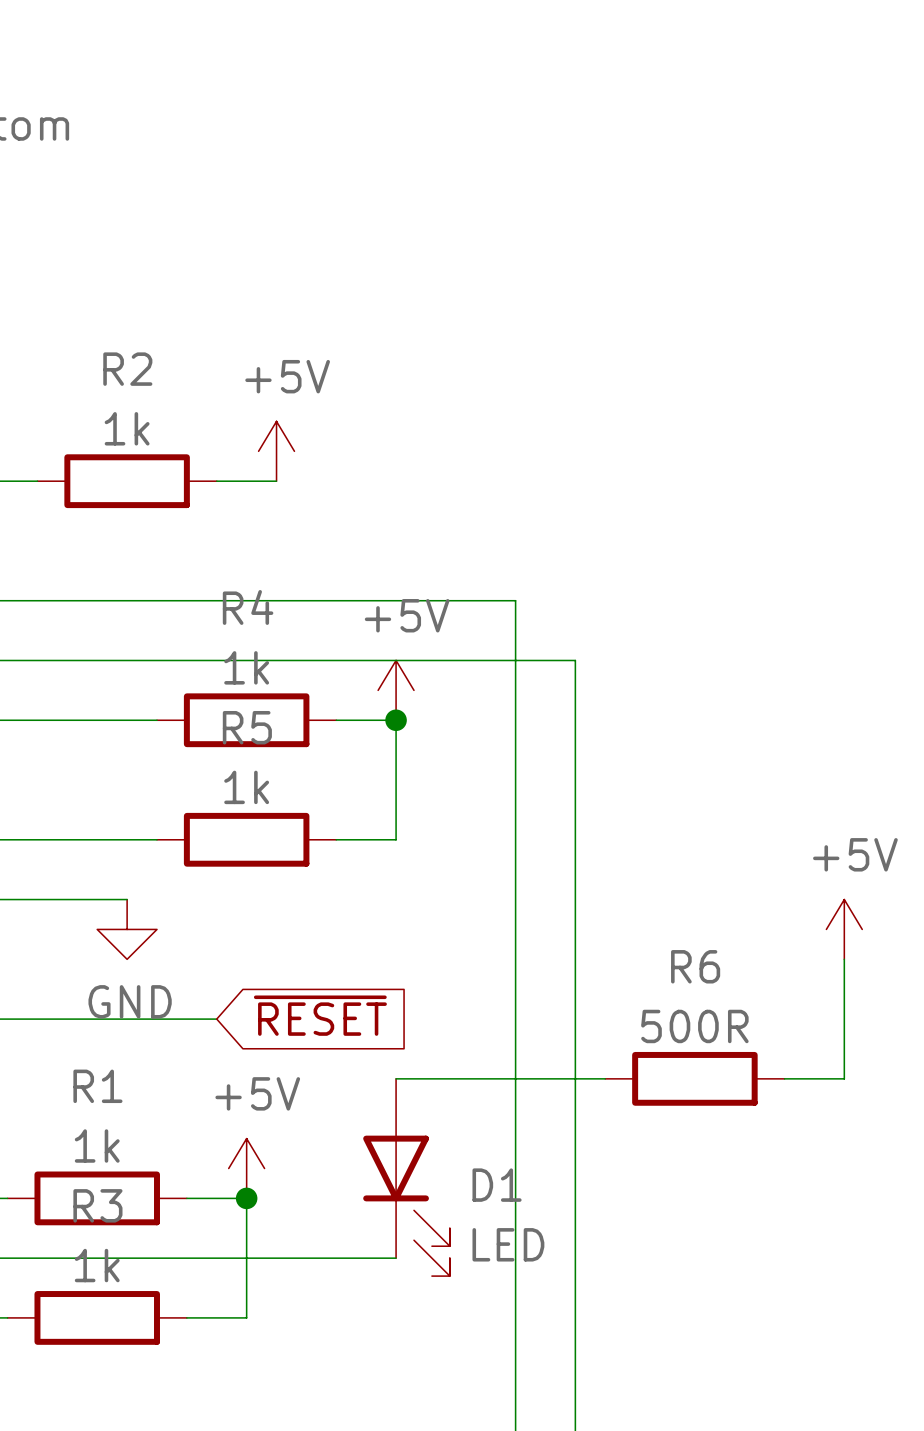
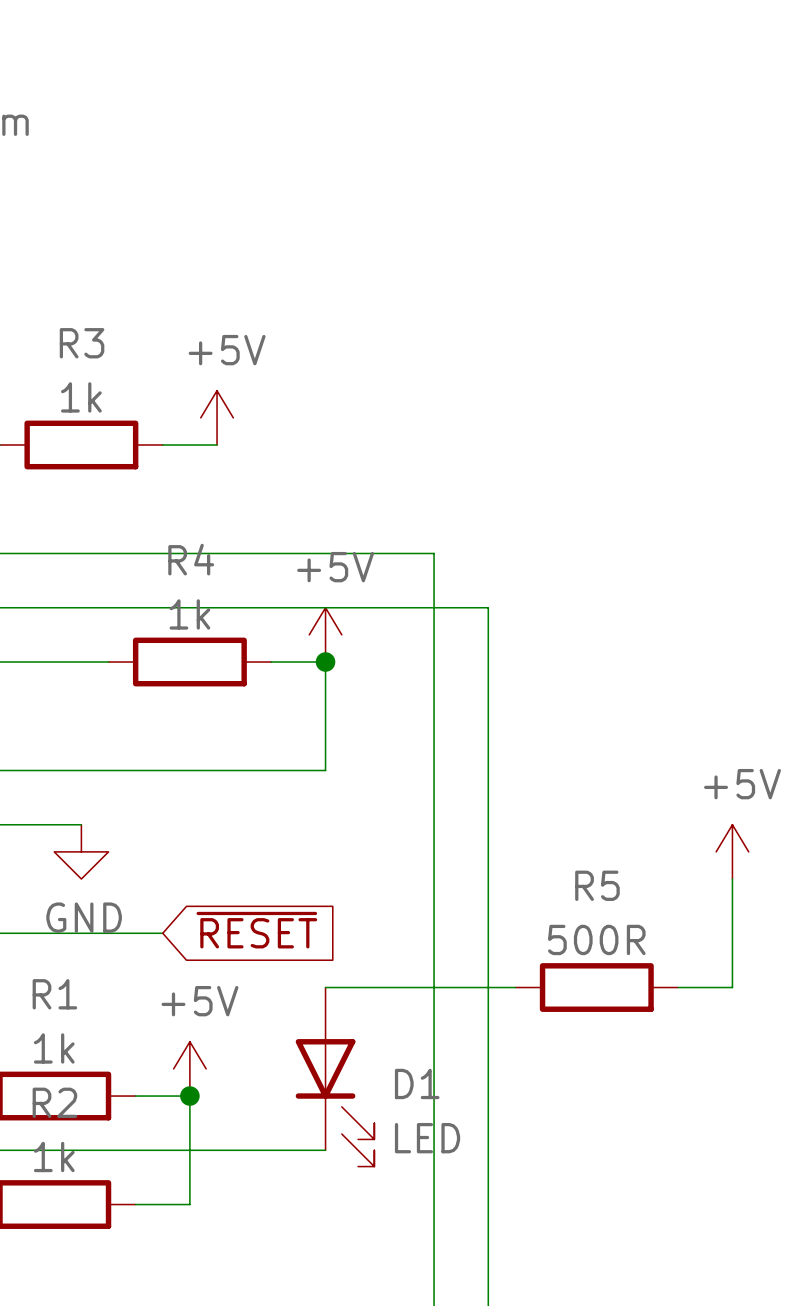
R2 name: R2 (127, 369) -> R3 (82, 343)
wire: none -> (108, 770) (271, 770)
R5: 1k (246, 839) -> none
R6 name: R6 (695, 966) -> R5 (597, 885)
R3 name: R3 (97, 1205) -> R2 (54, 1102)

